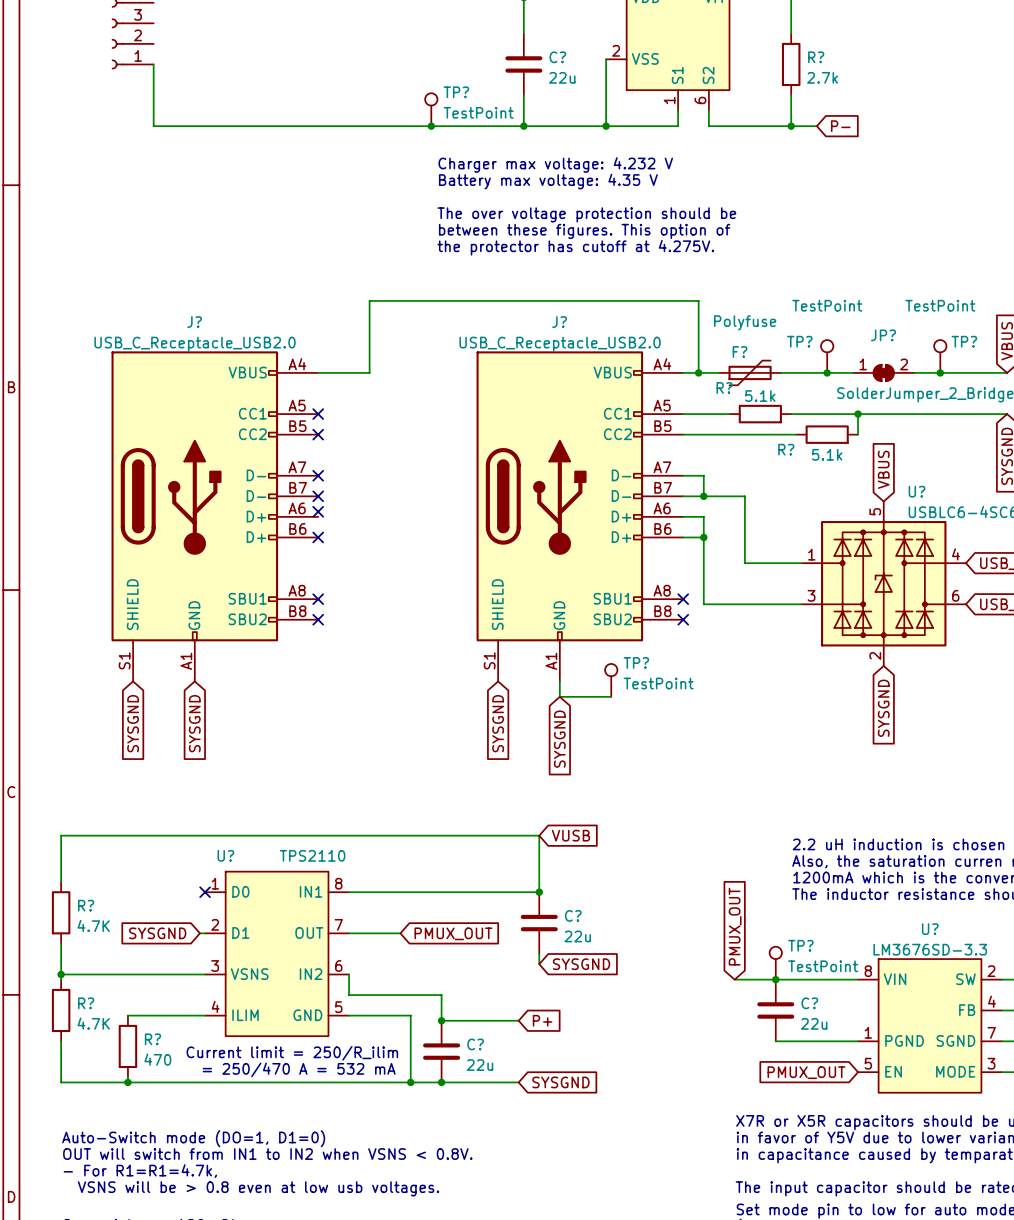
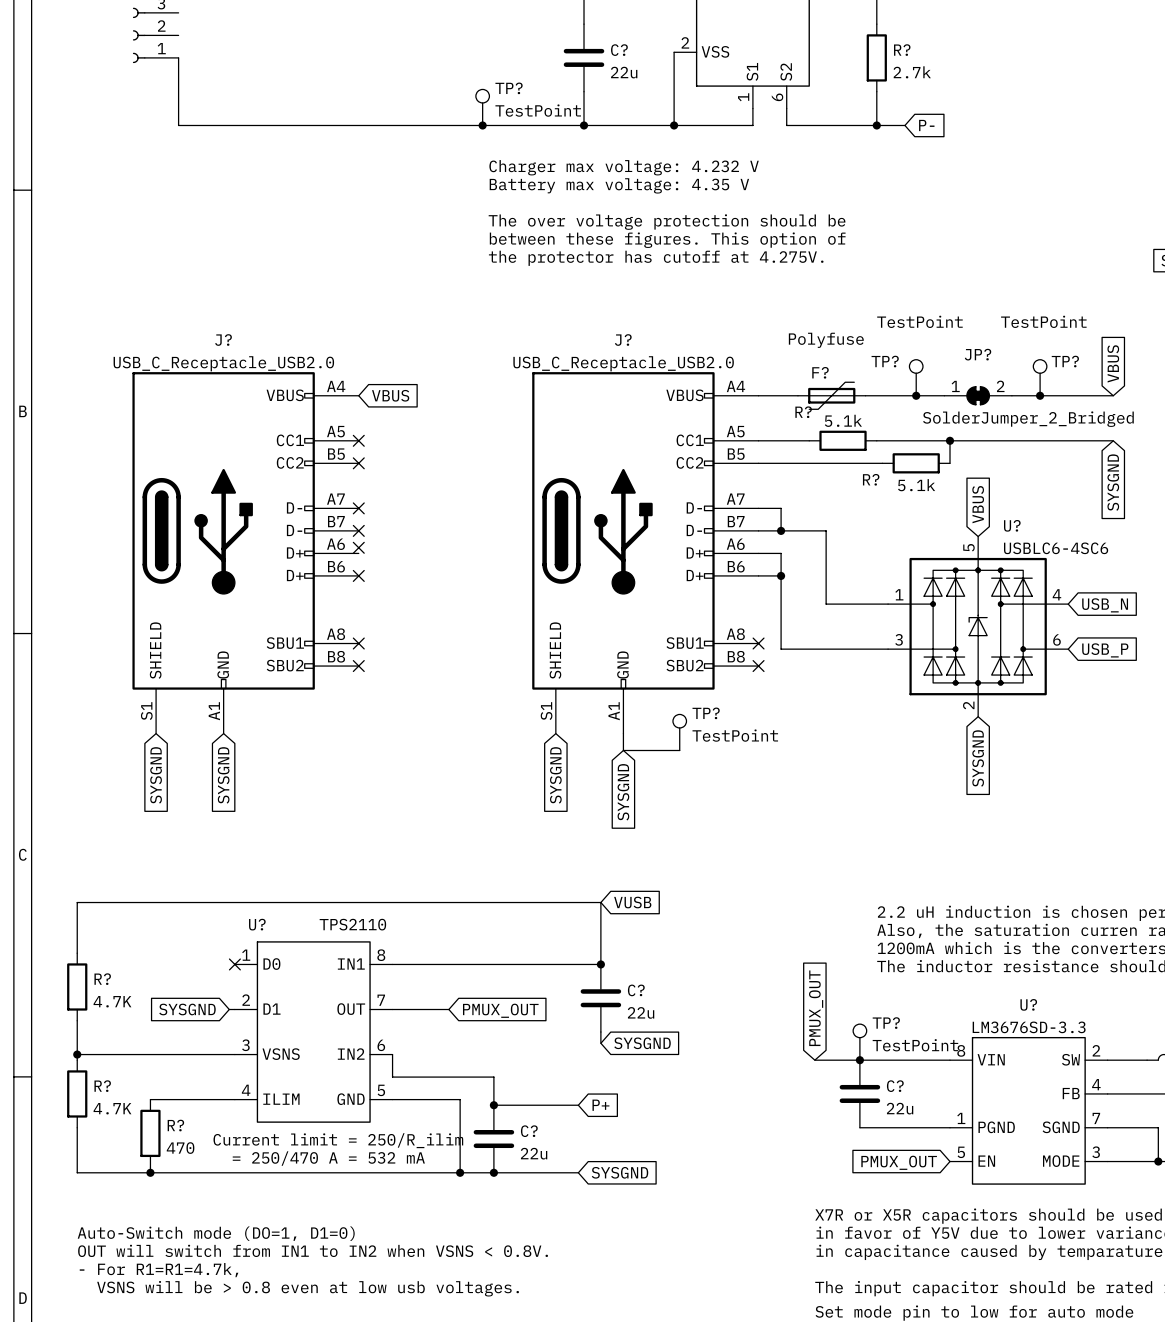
wire: (318, 372) (369, 372) (369, 300) (698, 300) (698, 372) -> none
global label: none -> VBUS (390, 395)
junction: (698, 372) -> none

